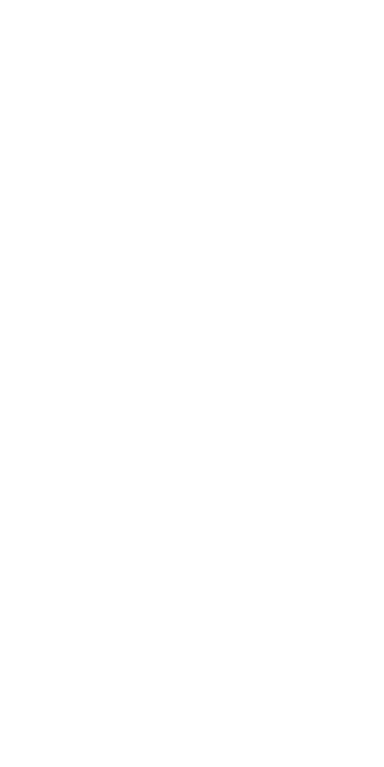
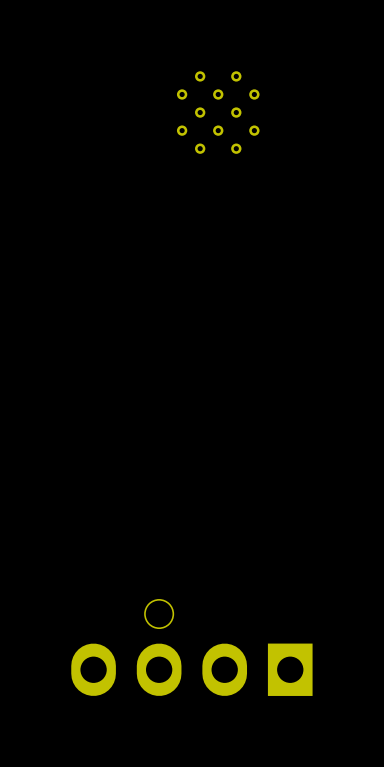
part: none -> (218, 112)
part: none -> (191, 647)

